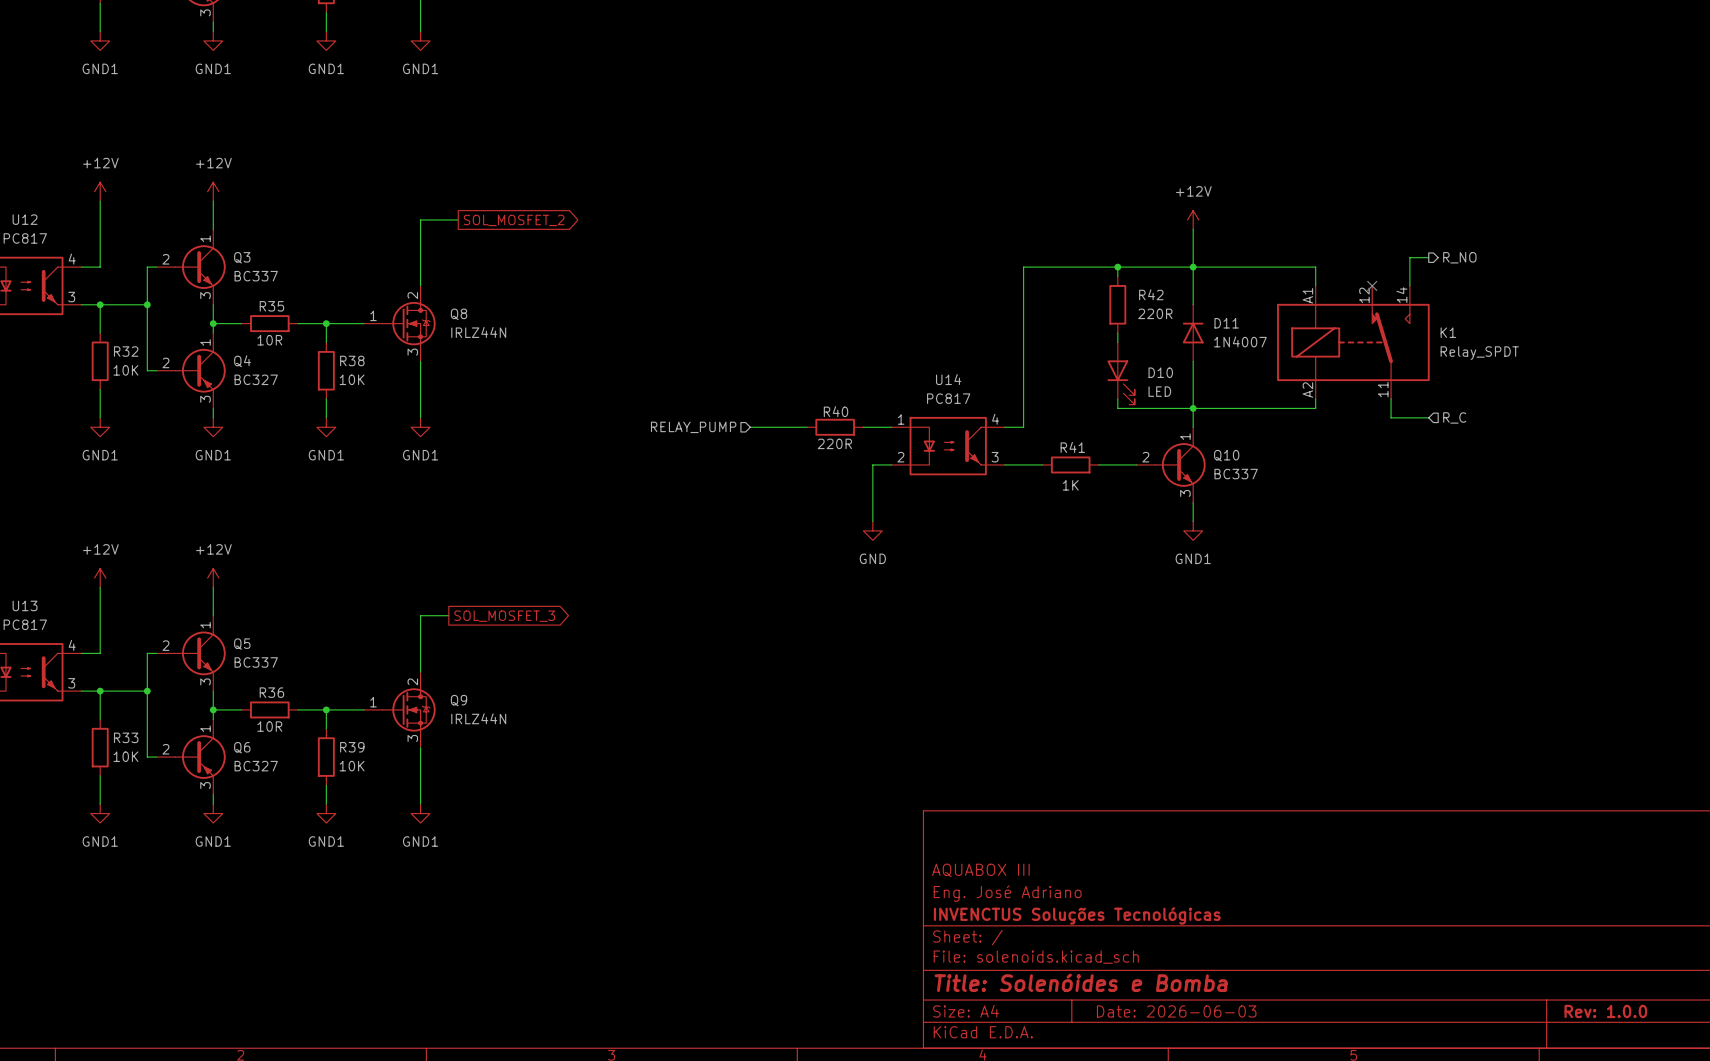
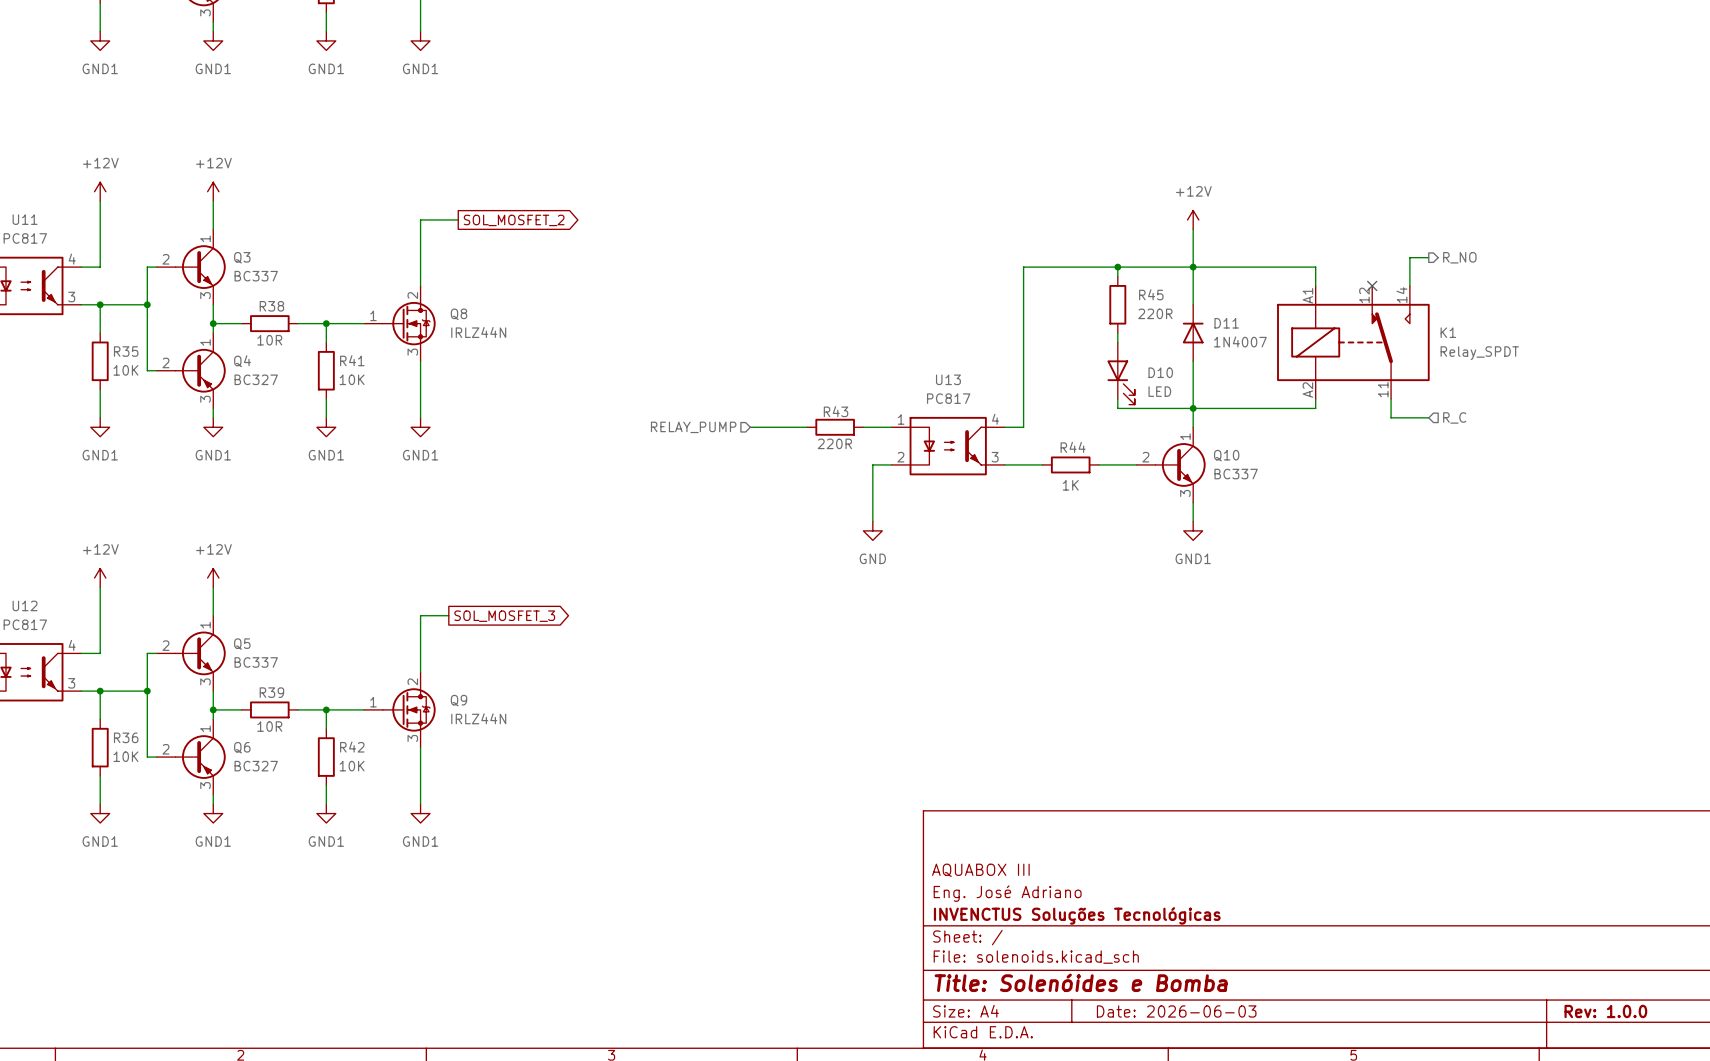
U12 name: U12 (25, 219) -> U11 (25, 219)
R42 name: R42 (1151, 294) -> R45 (1151, 294)
R35 name: R35 (271, 306) -> R38 (271, 306)
R32 name: R32 (126, 351) -> R35 (126, 351)
R38 name: R38 (352, 360) -> R41 (352, 360)
U14 name: U14 (948, 379) -> U13 (948, 379)
R40 name: R40 (836, 411) -> R43 (836, 411)
R41 name: R41 (1072, 447) -> R44 (1073, 447)
U13 name: U13 (25, 605) -> U12 (25, 605)
R36 name: R36 (271, 692) -> R39 (271, 692)
R33 name: R33 (126, 737) -> R36 (126, 737)
R39 name: R39 (352, 747) -> R42 (352, 747)

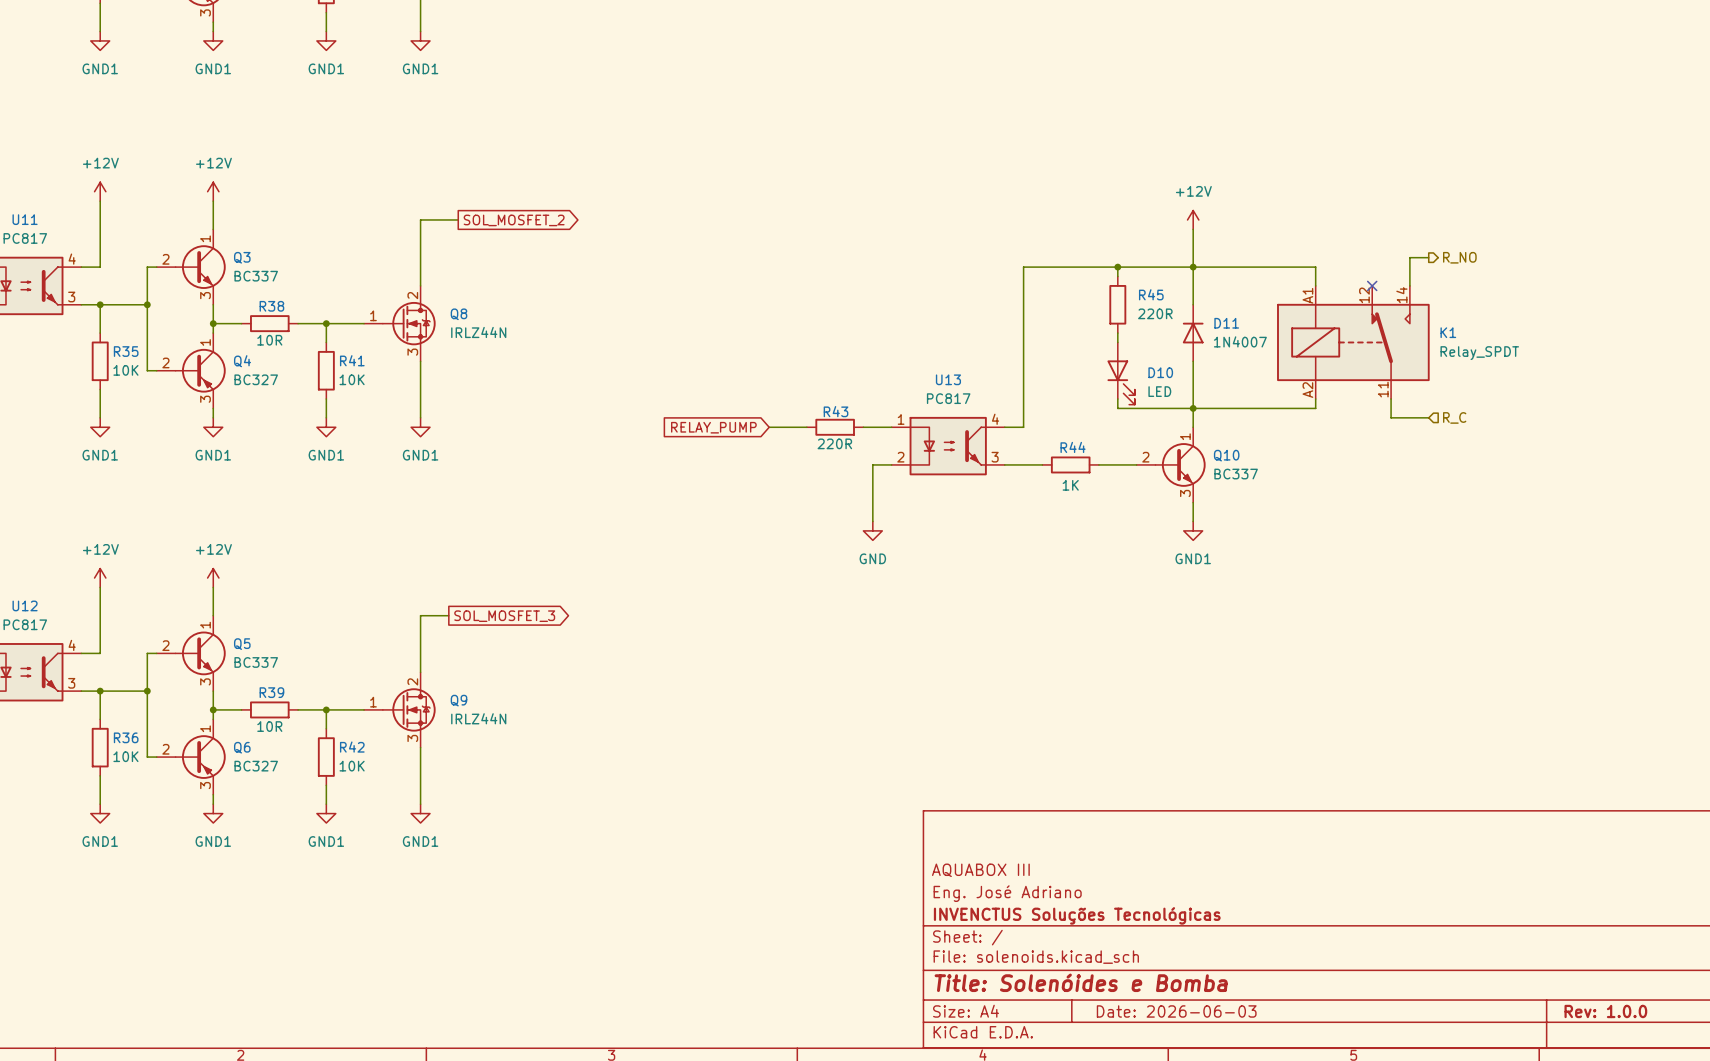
hierarchical label: RELAY_PUMP (693, 427) -> none
global label: none -> RELAY_PUMP (713, 427)
wire: (750, 427) (769, 427) -> none

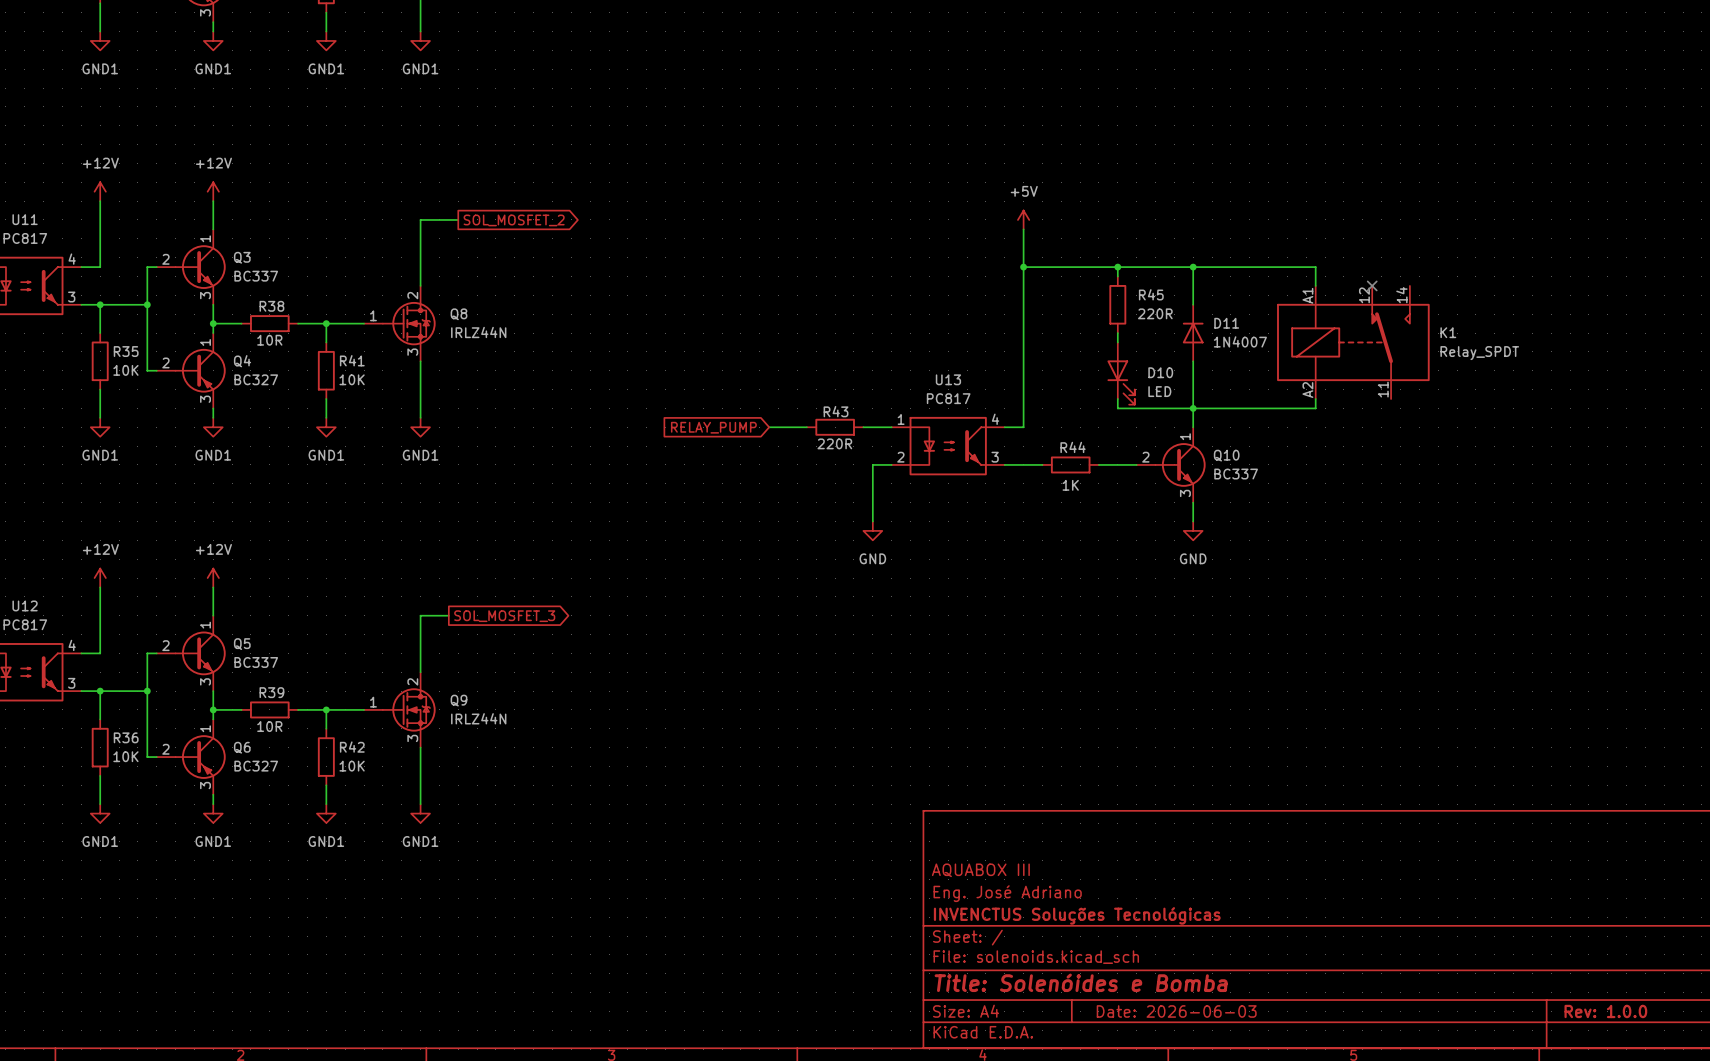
power symbol: none -> +5V (1023, 219)
power symbol: +12V (1193, 219) -> none
wire: (1193, 229) (1193, 267) -> (1023, 229) (1023, 267)
wire: (1428, 257) (1409, 257) (1409, 285) -> none
hierarchical label: R_NO (1459, 257) -> none
junction: none -> (1023, 267)
wire: (1391, 399) (1391, 417) (1428, 417) -> none
hierarchical label: R_C (1454, 417) -> none
power symbol: GND1 (1193, 530) -> GND (1193, 530)

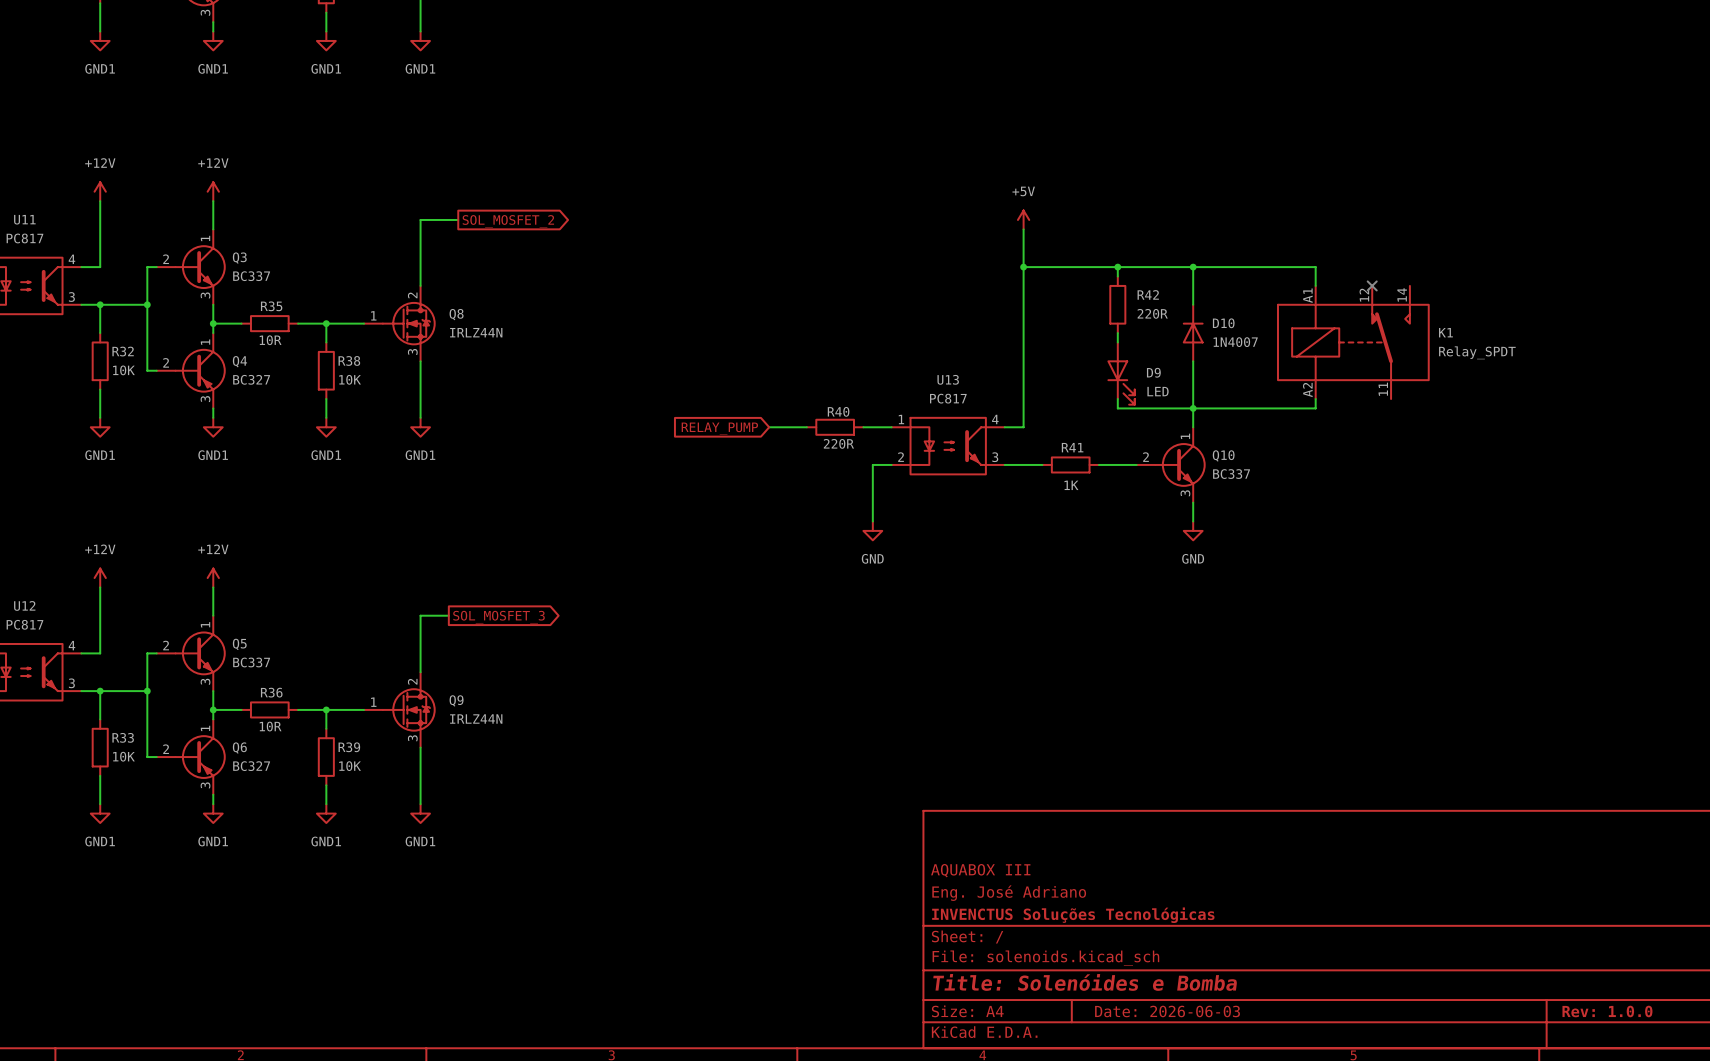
R45 name: R45 (1151, 294) -> R42 (1148, 294)
R38 name: R38 (271, 306) -> R35 (271, 306)
D11 name: D11 (1226, 323) -> D10 (1223, 323)
R35 name: R35 (126, 351) -> R32 (123, 351)
R41 name: R41 (352, 360) -> R38 (349, 360)
D10 name: D10 (1160, 372) -> D9 (1153, 372)
R43 name: R43 (836, 411) -> R40 (838, 411)
R44 name: R44 (1073, 447) -> R41 (1072, 447)
R39 name: R39 (271, 692) -> R36 (271, 692)
R36 name: R36 (126, 737) -> R33 (123, 737)
R42 name: R42 (352, 747) -> R39 (349, 747)

